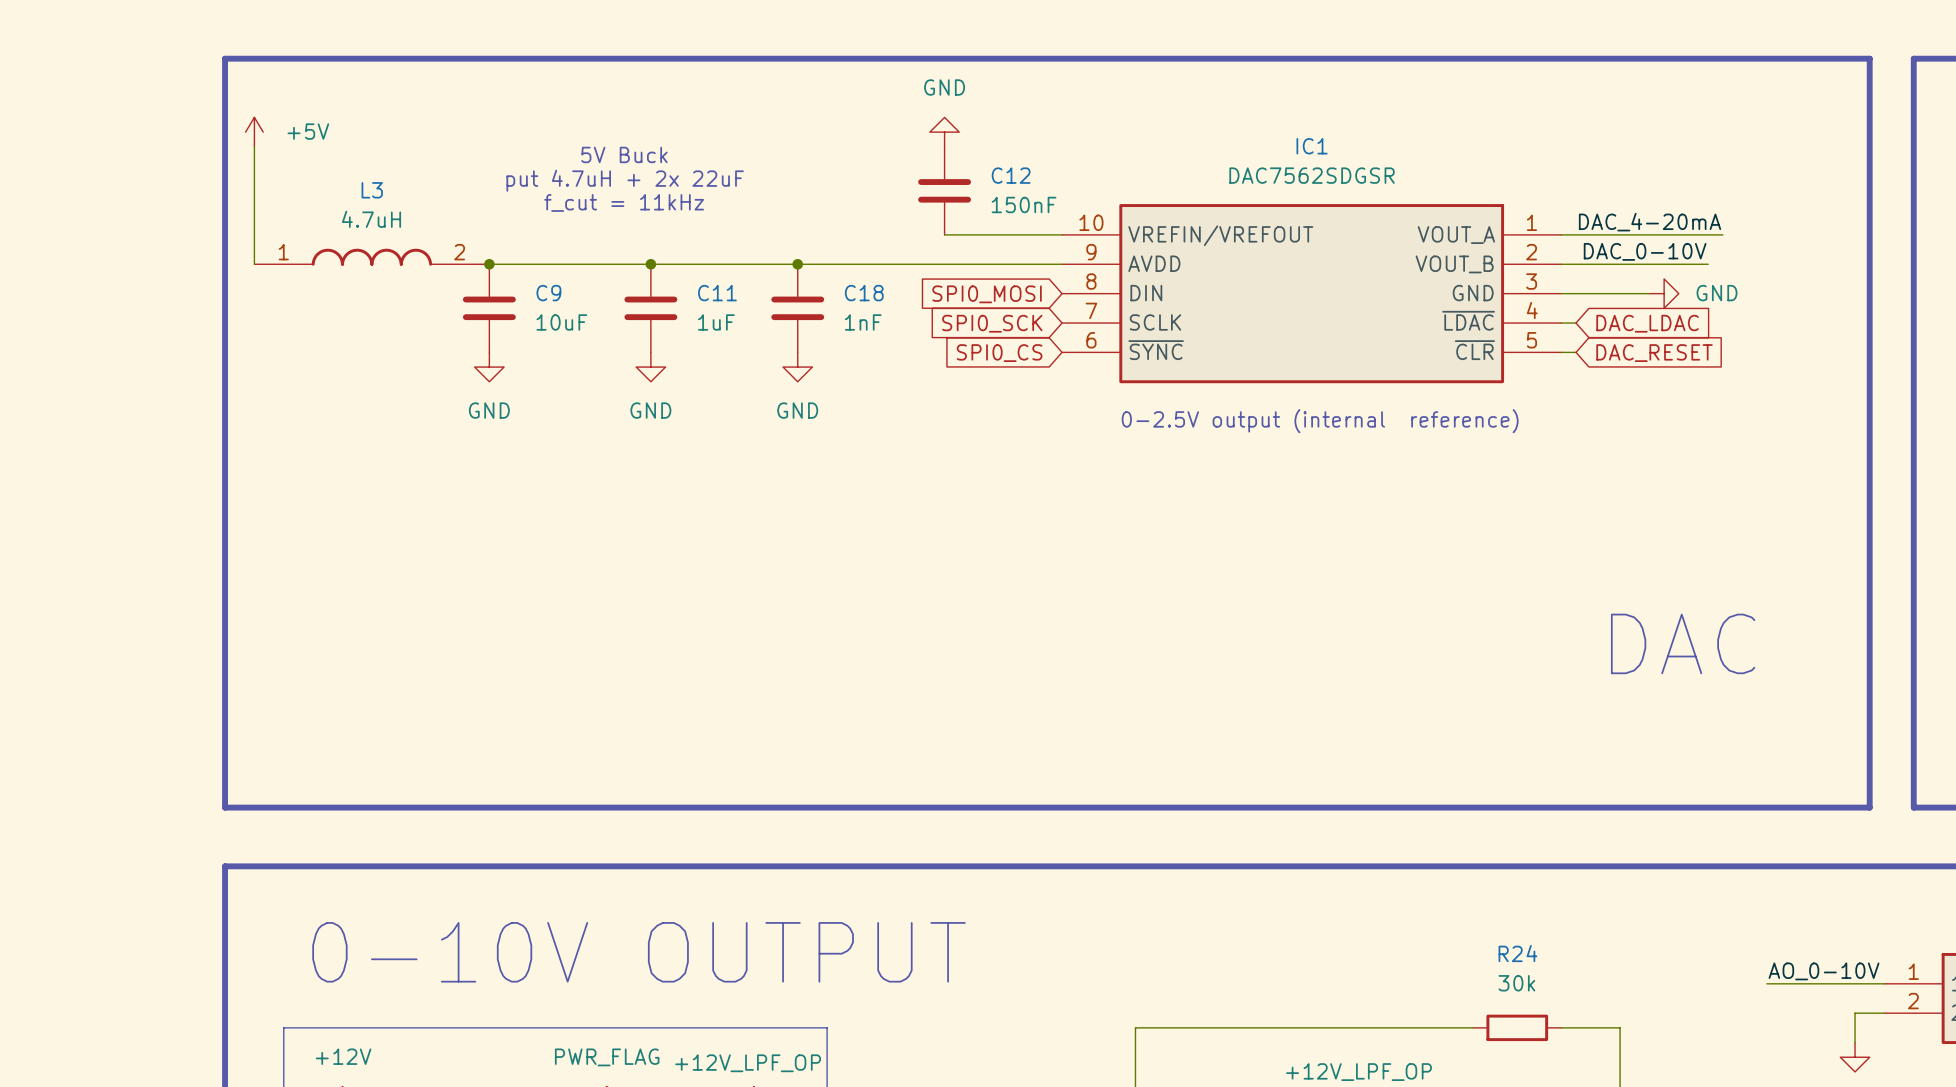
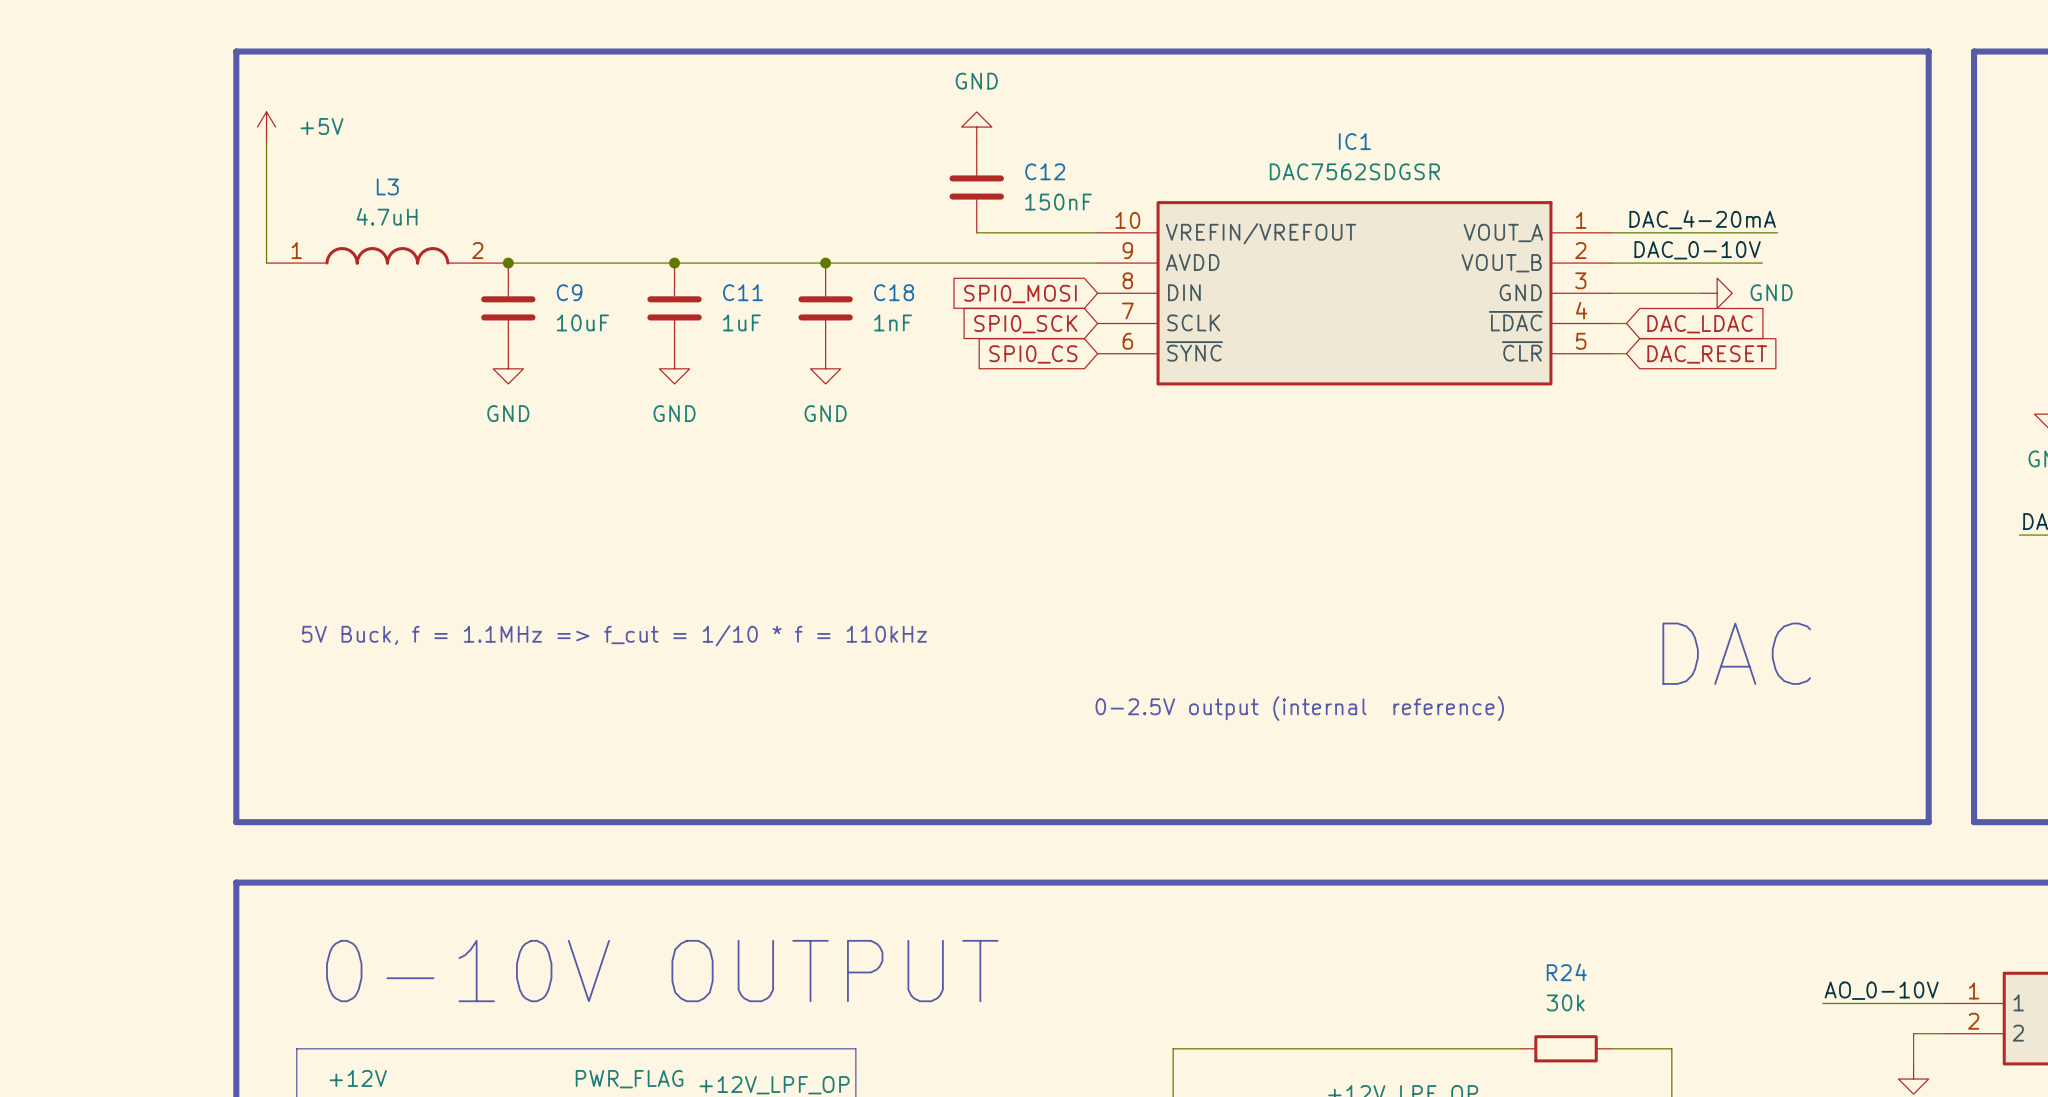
text: 5V Buck (624, 154) -> none
text: put 4.7uH + 2x 22uF (625, 180) -> none
text: f_cut = 11kHz (624, 202) -> none
text position: 0-2.5V output (internal reference) (1320, 421) -> 0-2.5V output (internal reference) (1299, 708)
text: none -> 5V Buck, f = 1.1MHz => f_cut = 1/10 * f = 110kHz (614, 635)

